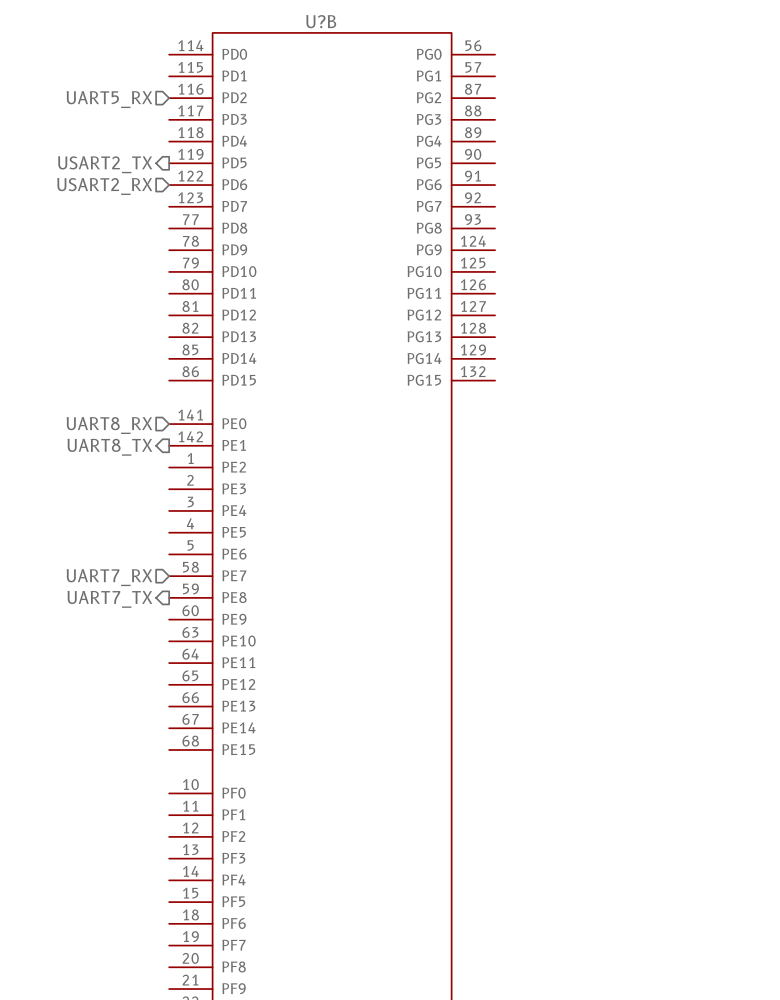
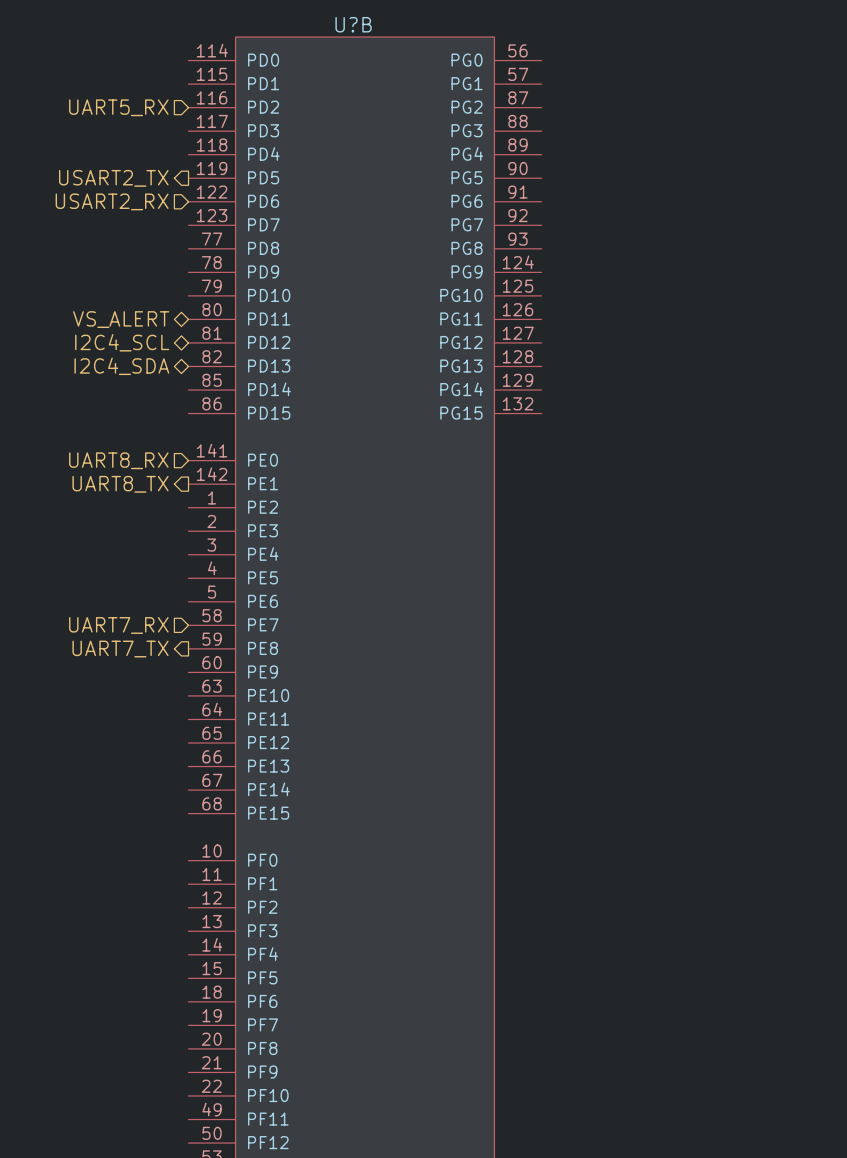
hierarchical label: none -> VS_ALERT (121, 319)
hierarchical label: none -> I2C4_SCL (122, 342)
hierarchical label: none -> I2C4_SDA (121, 366)

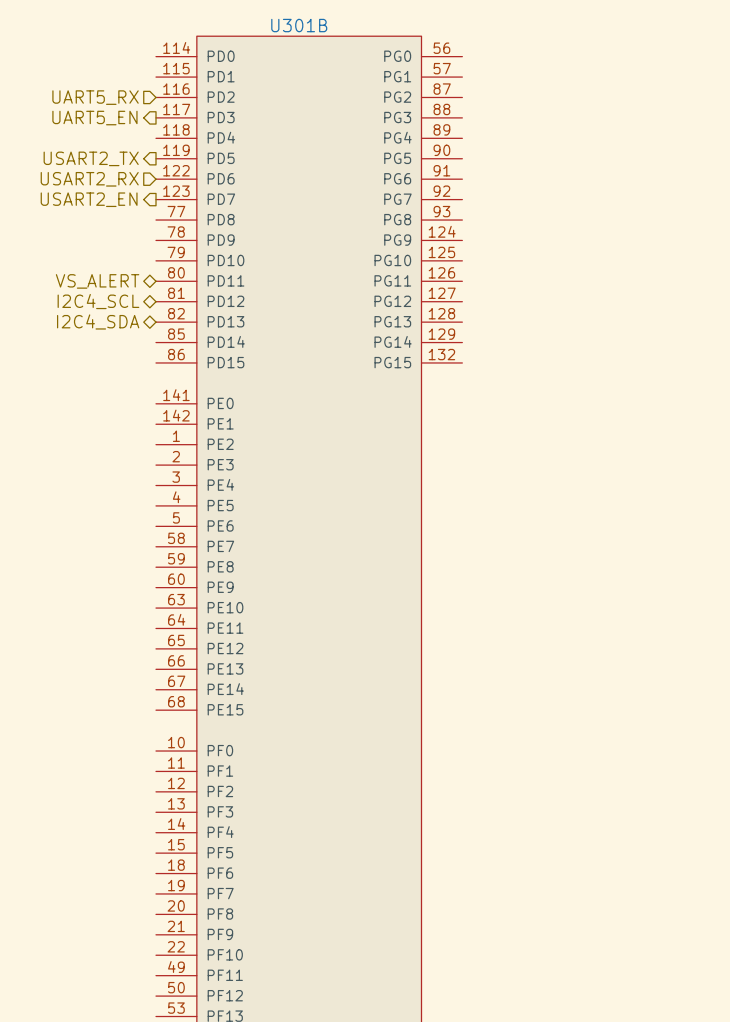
U?B name: U?B (353, 24) -> U301B (299, 25)
hierarchical label: none -> UART5_EN (94, 118)
hierarchical label: none -> USART2_EN (89, 199)
hierarchical label: UART8_RX (118, 460) -> none
hierarchical label: UART8_TX (120, 484) -> none
hierarchical label: UART7_RX (118, 625) -> none
hierarchical label: UART7_TX (120, 649) -> none

